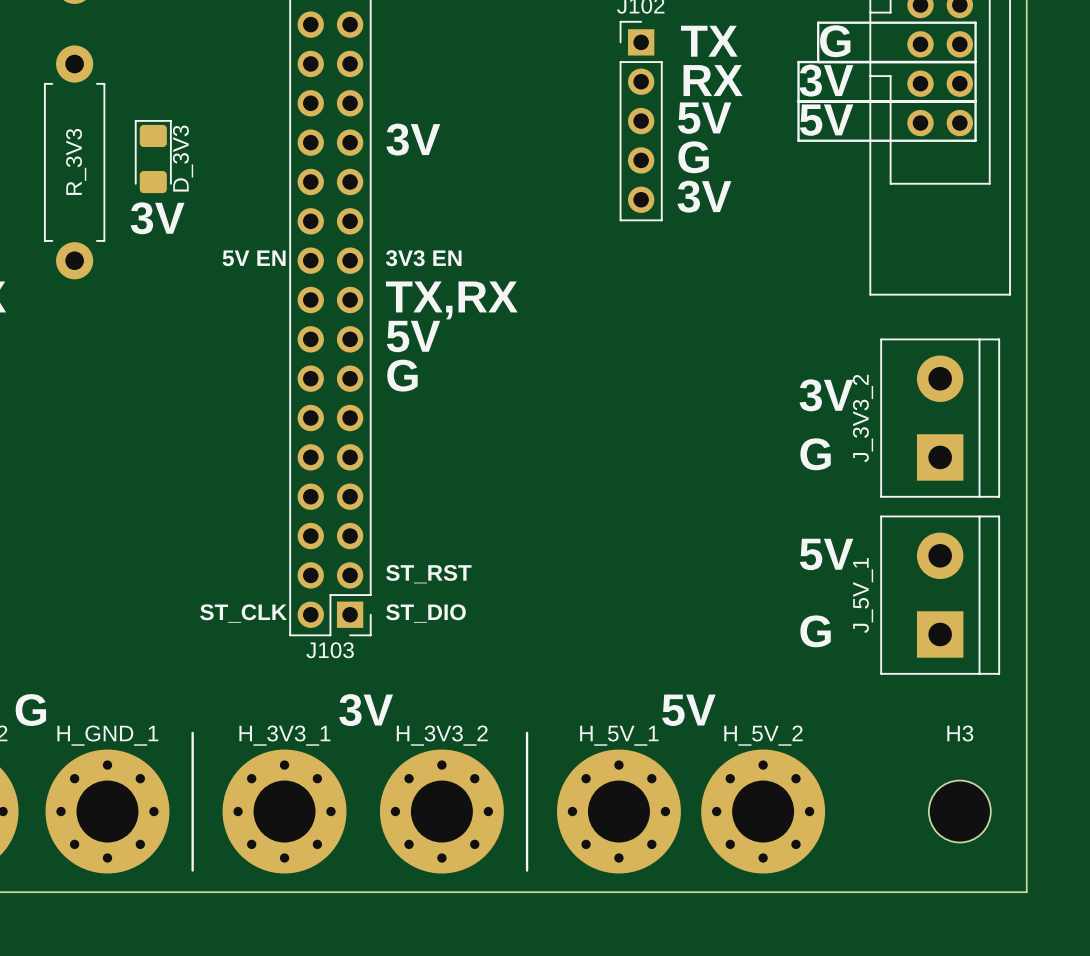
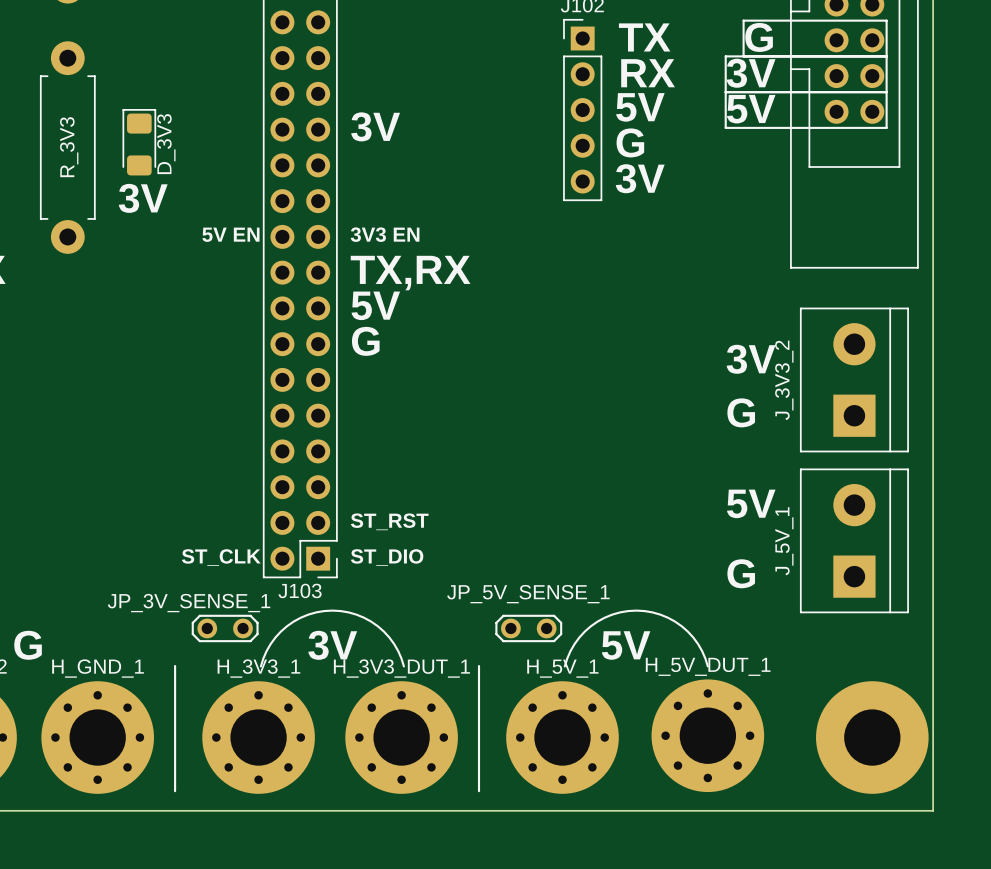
JP_3V_SENSE_1: none -> (225, 628)
JP_5V_SENSE_1: none -> (528, 628)
line: none -> (260, 666) (270, 644) (287, 626) (308, 614) (332, 610) (356, 614) (377, 626) (394, 644) (403, 666)
line: none -> (564, 666) (574, 644) (590, 626) (612, 614) (636, 610) (660, 614) (681, 626) (698, 644) (707, 666)
H_3V3_2 name: H_3V3_2 (442, 735) -> H_3V3_DUT_1 (401, 668)
H_5V_DUT_1: none -> (707, 735)
H_5V_2: (763, 811) -> none
H3: (959, 811) -> none
part: none -> (872, 737)

